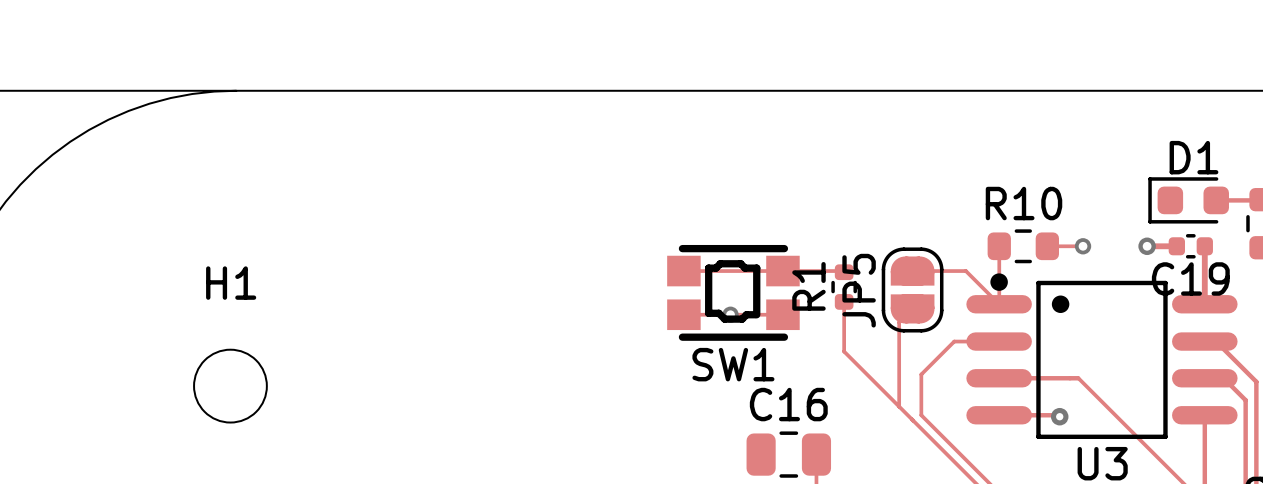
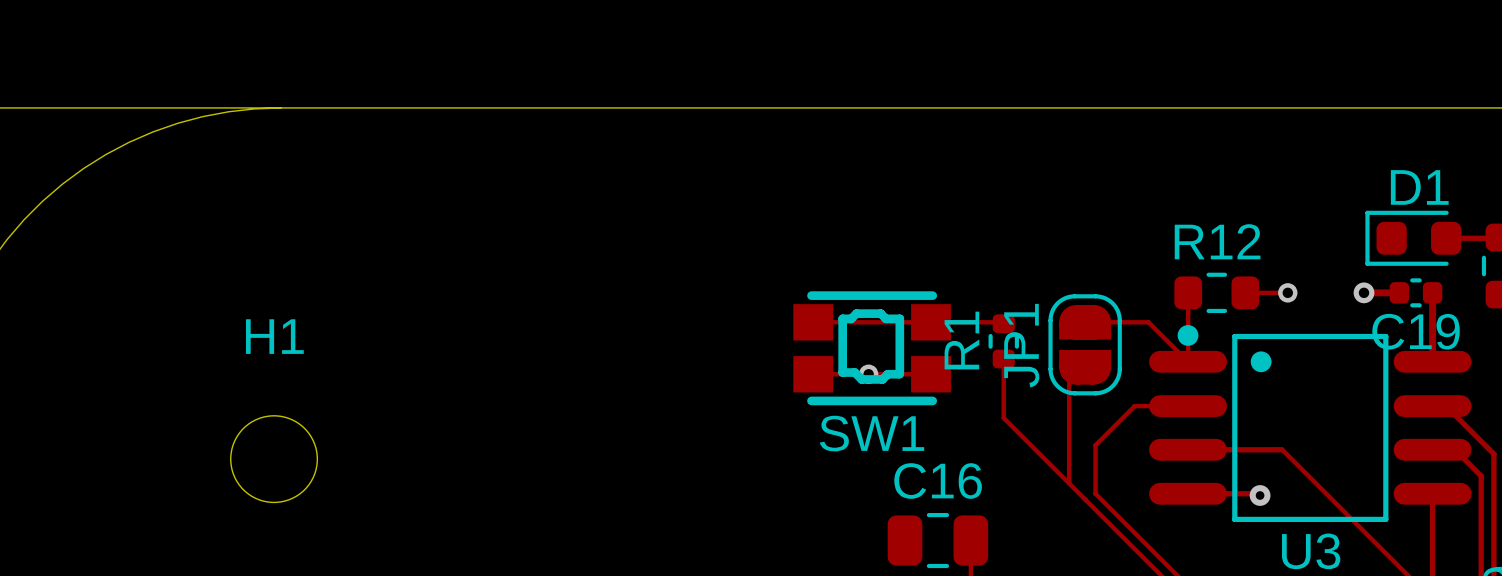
R10 name: R10 (1024, 203) -> R12 (1217, 241)
JP5 name: JP5 (859, 290) -> JP1 (1021, 345)

